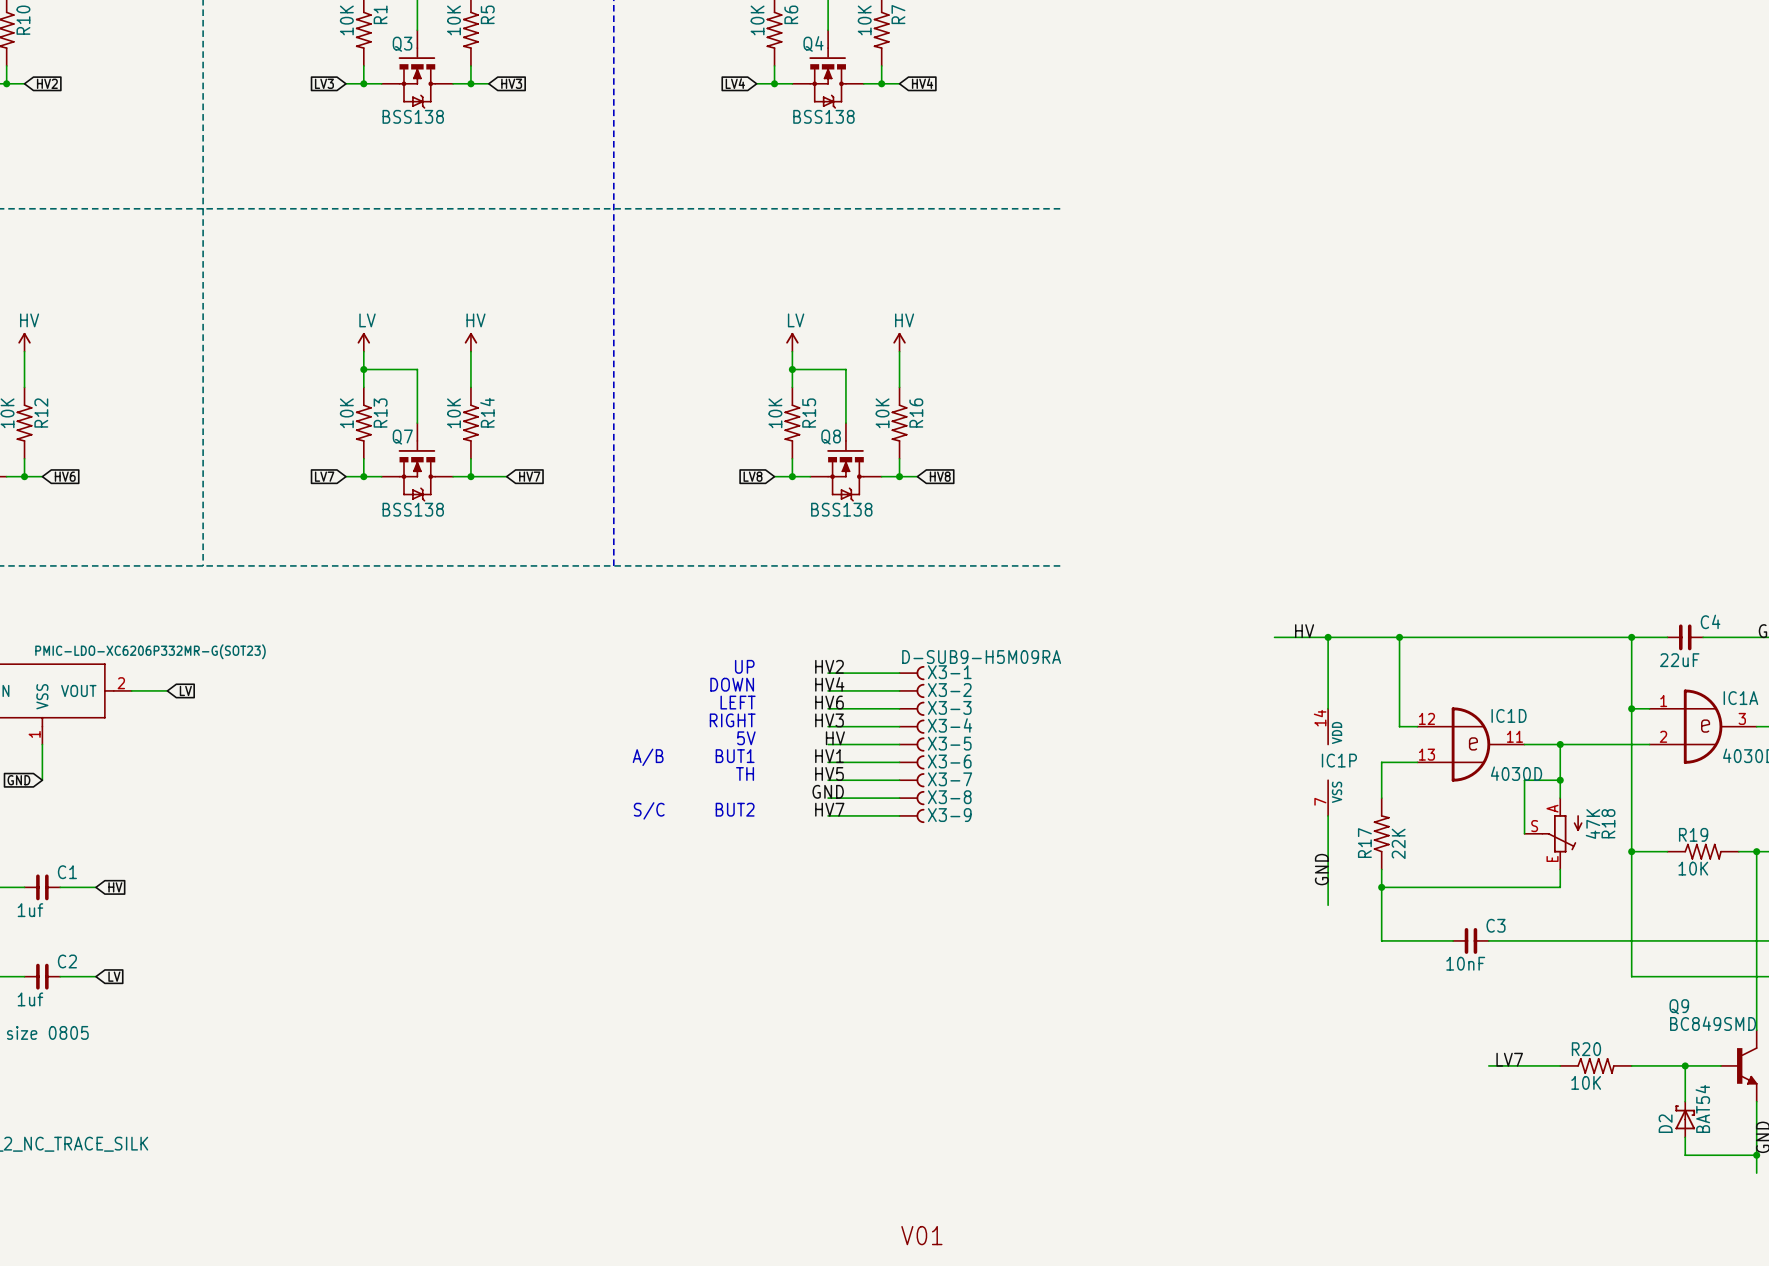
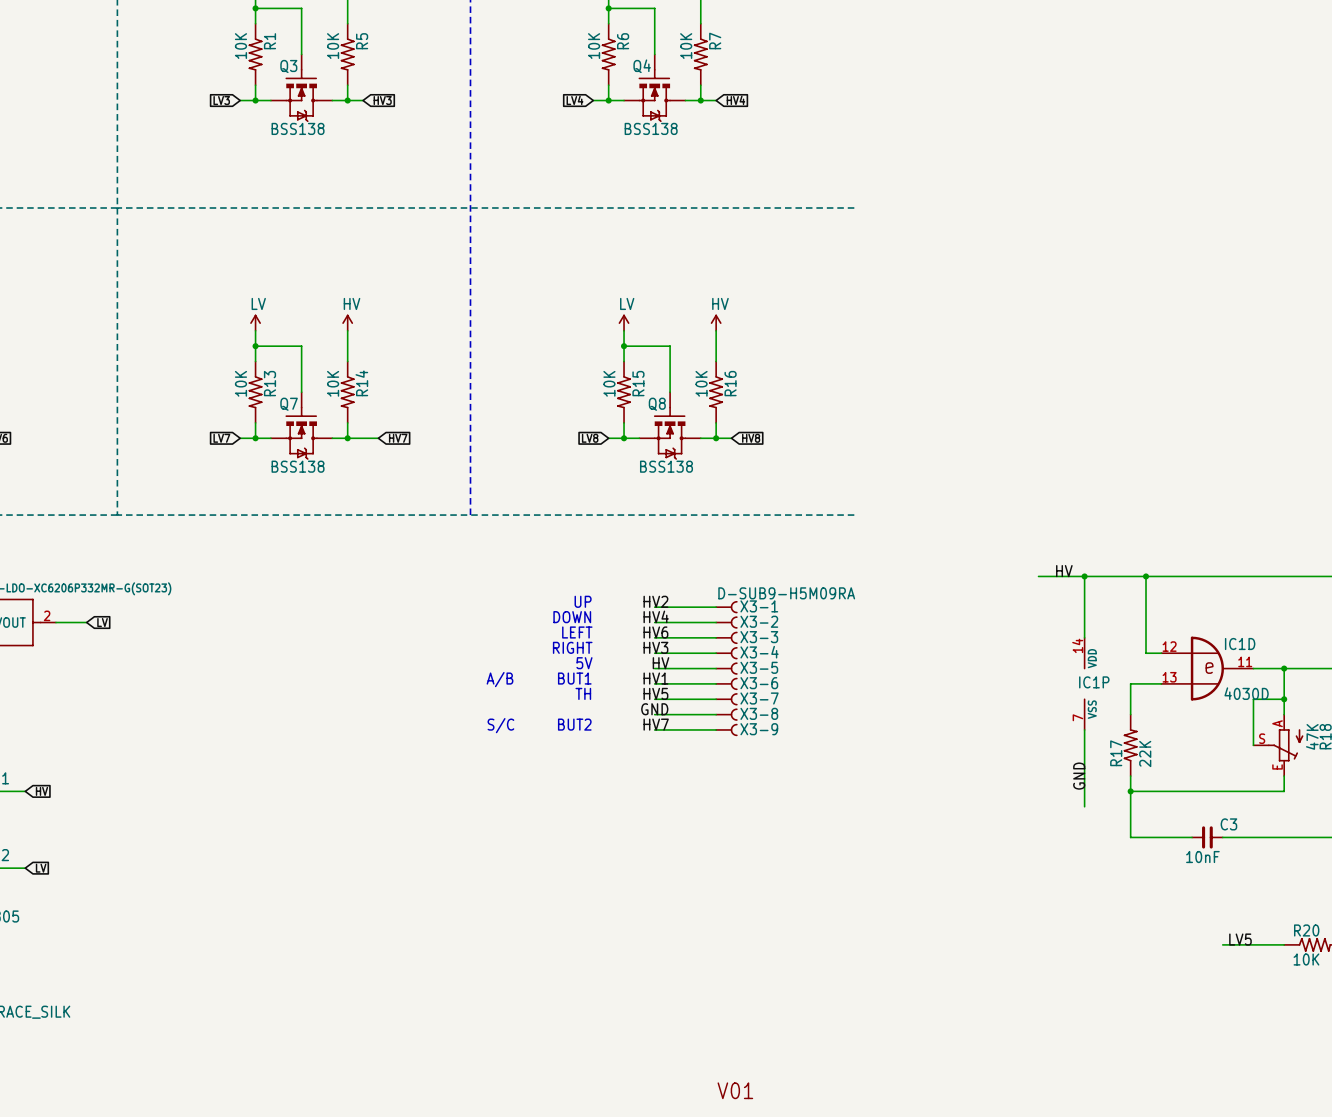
label: LV7 (1509, 1059) -> LV5 (1240, 939)

